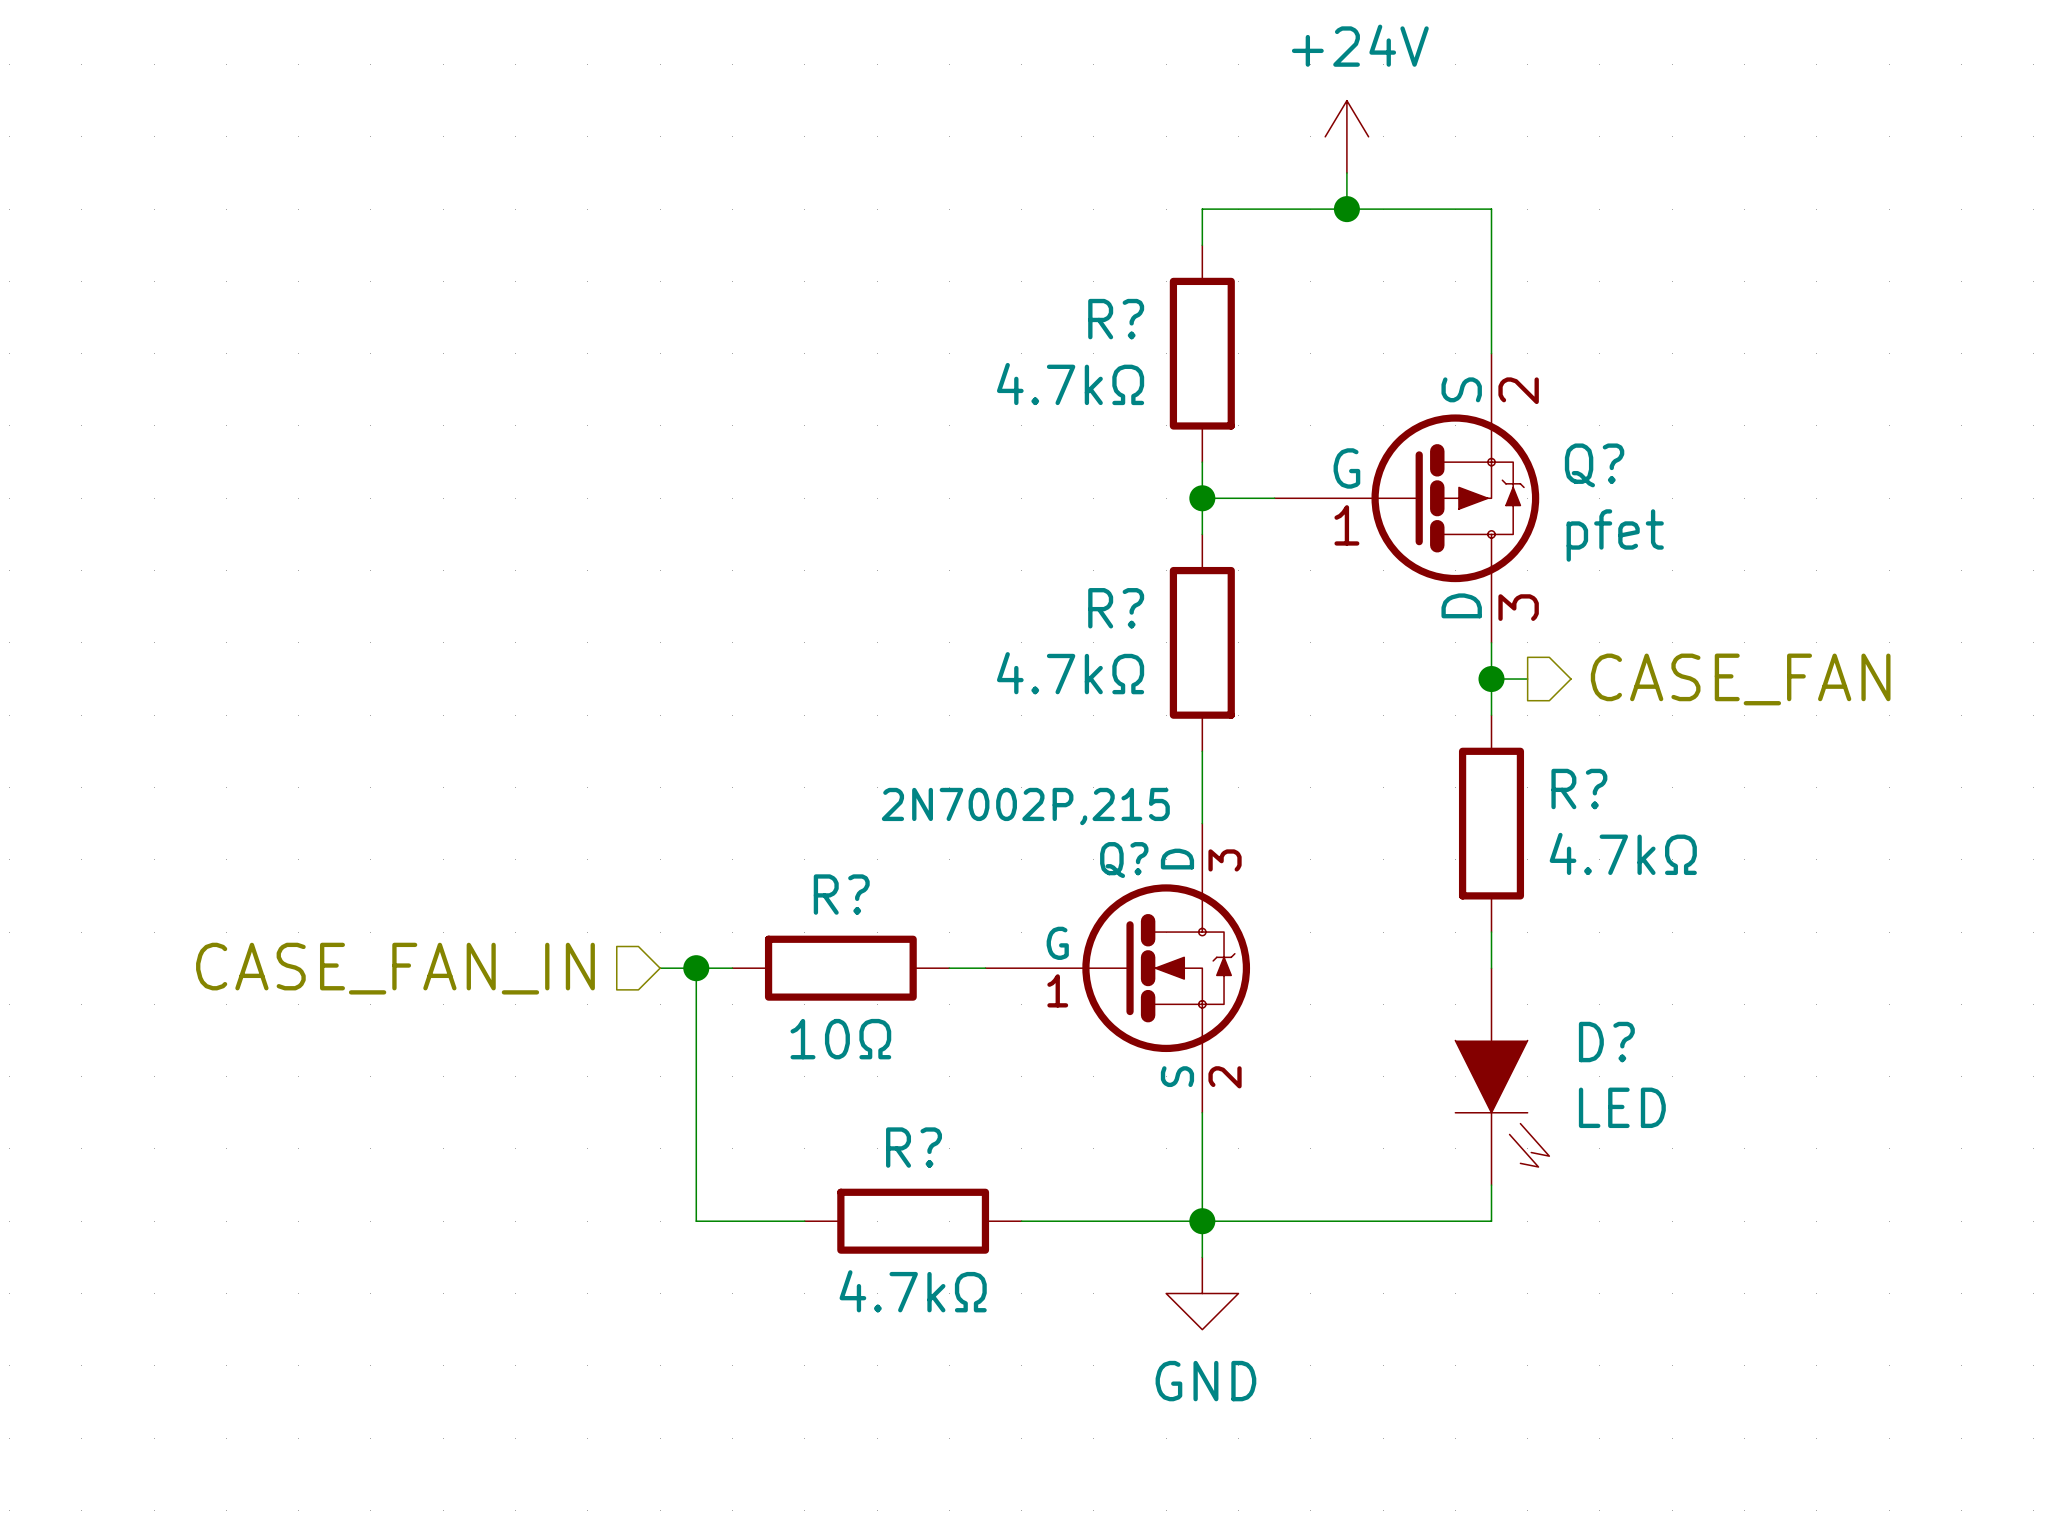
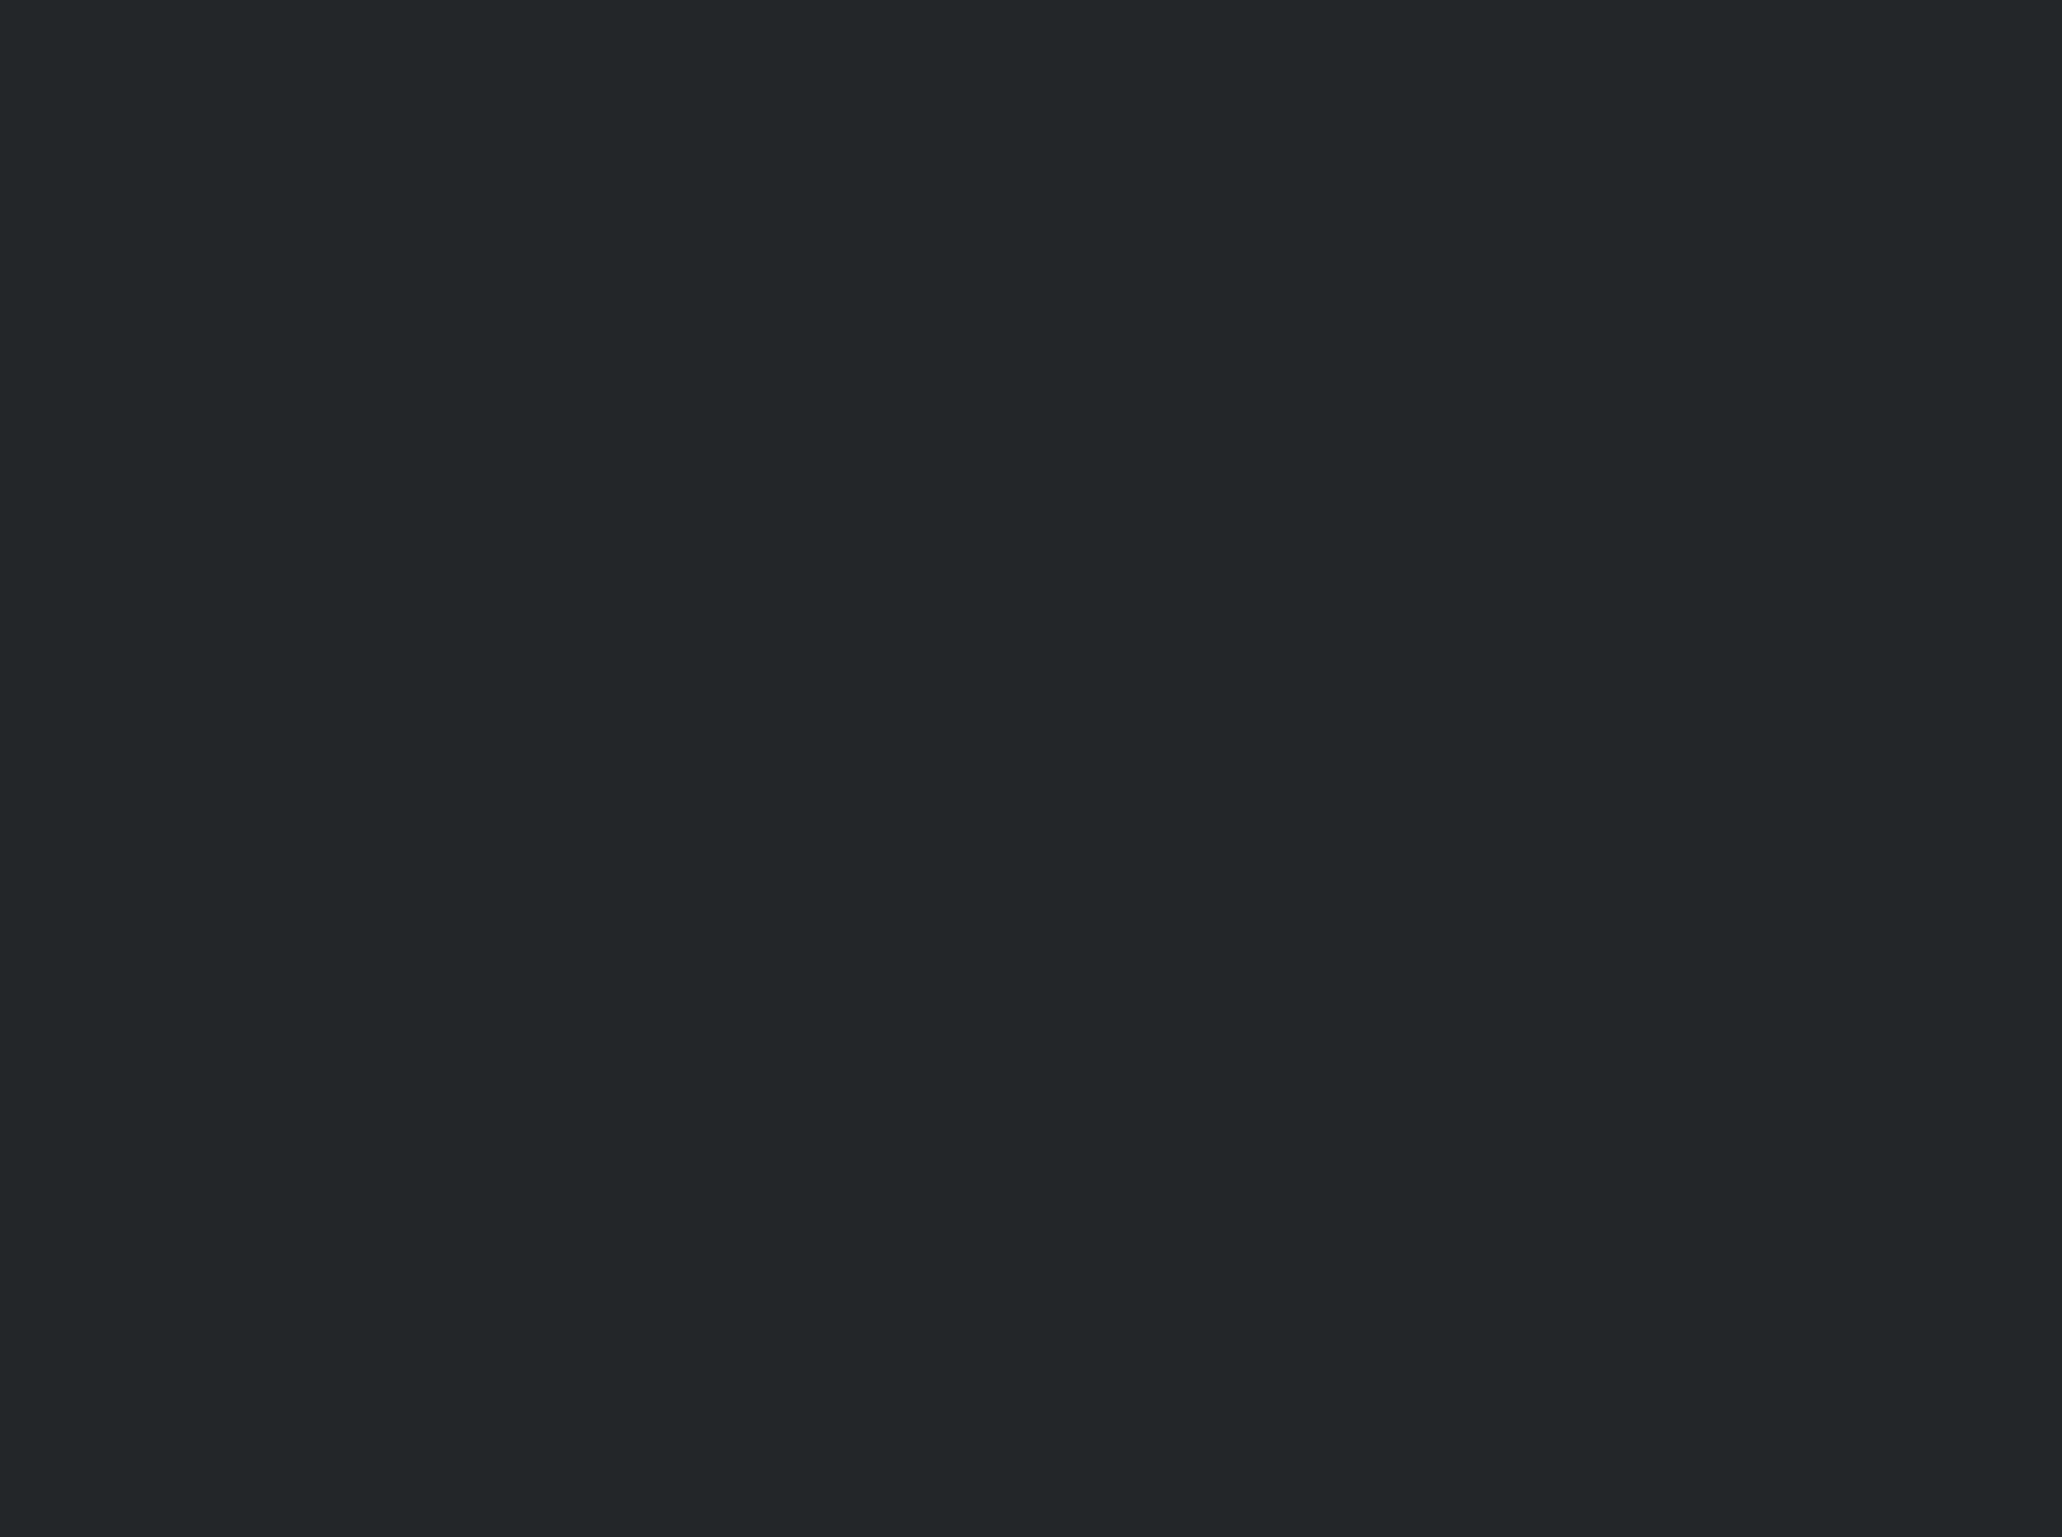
power symbol: +24V (1346, 136) -> none
wire: (1346, 172) (1346, 209) -> none
junction: (1346, 209) -> none
wire: (1202, 245) (1202, 209) (1491, 209) (1491, 353) -> none
R?: 4.7kΩ (1202, 353) -> none
wire: (1202, 462) (1202, 534) -> none
wire: (1202, 498) (1274, 498) -> none
junction: (1202, 498) -> none
Q?: pfet (1406, 498) -> none
R?: 4.7kΩ (1202, 642) -> none
wire: (1491, 642) (1491, 715) -> none
wire: (1491, 679) (1527, 679) -> none
junction: (1491, 679) -> none
hierarchical label: CASE_FAN (1740, 679) -> none
wire: (1202, 751) (1202, 823) -> none
R?: 4.7kΩ (1491, 823) -> none
wire: (1491, 932) (1491, 968) -> none
hierarchical label: CASE_FAN_IN (395, 968) -> none
wire: (660, 968) (732, 968) -> none
wire: (696, 968) (696, 1221) (804, 1221) -> none
junction: (696, 968) -> none
R?: 10Ω (840, 968) -> none
wire: (949, 968) (985, 968) -> none
Q?: 2N7002P,215 (1117, 968) -> none
D?: LED (1502, 1076) -> none
wire: (1202, 1112) (1202, 1257) -> none
wire: (1491, 1185) (1491, 1221) (1021, 1221) -> none
R?: 4.7kΩ (913, 1221) -> none
junction: (1202, 1221) -> none
power symbol: GND (1202, 1293) -> none

